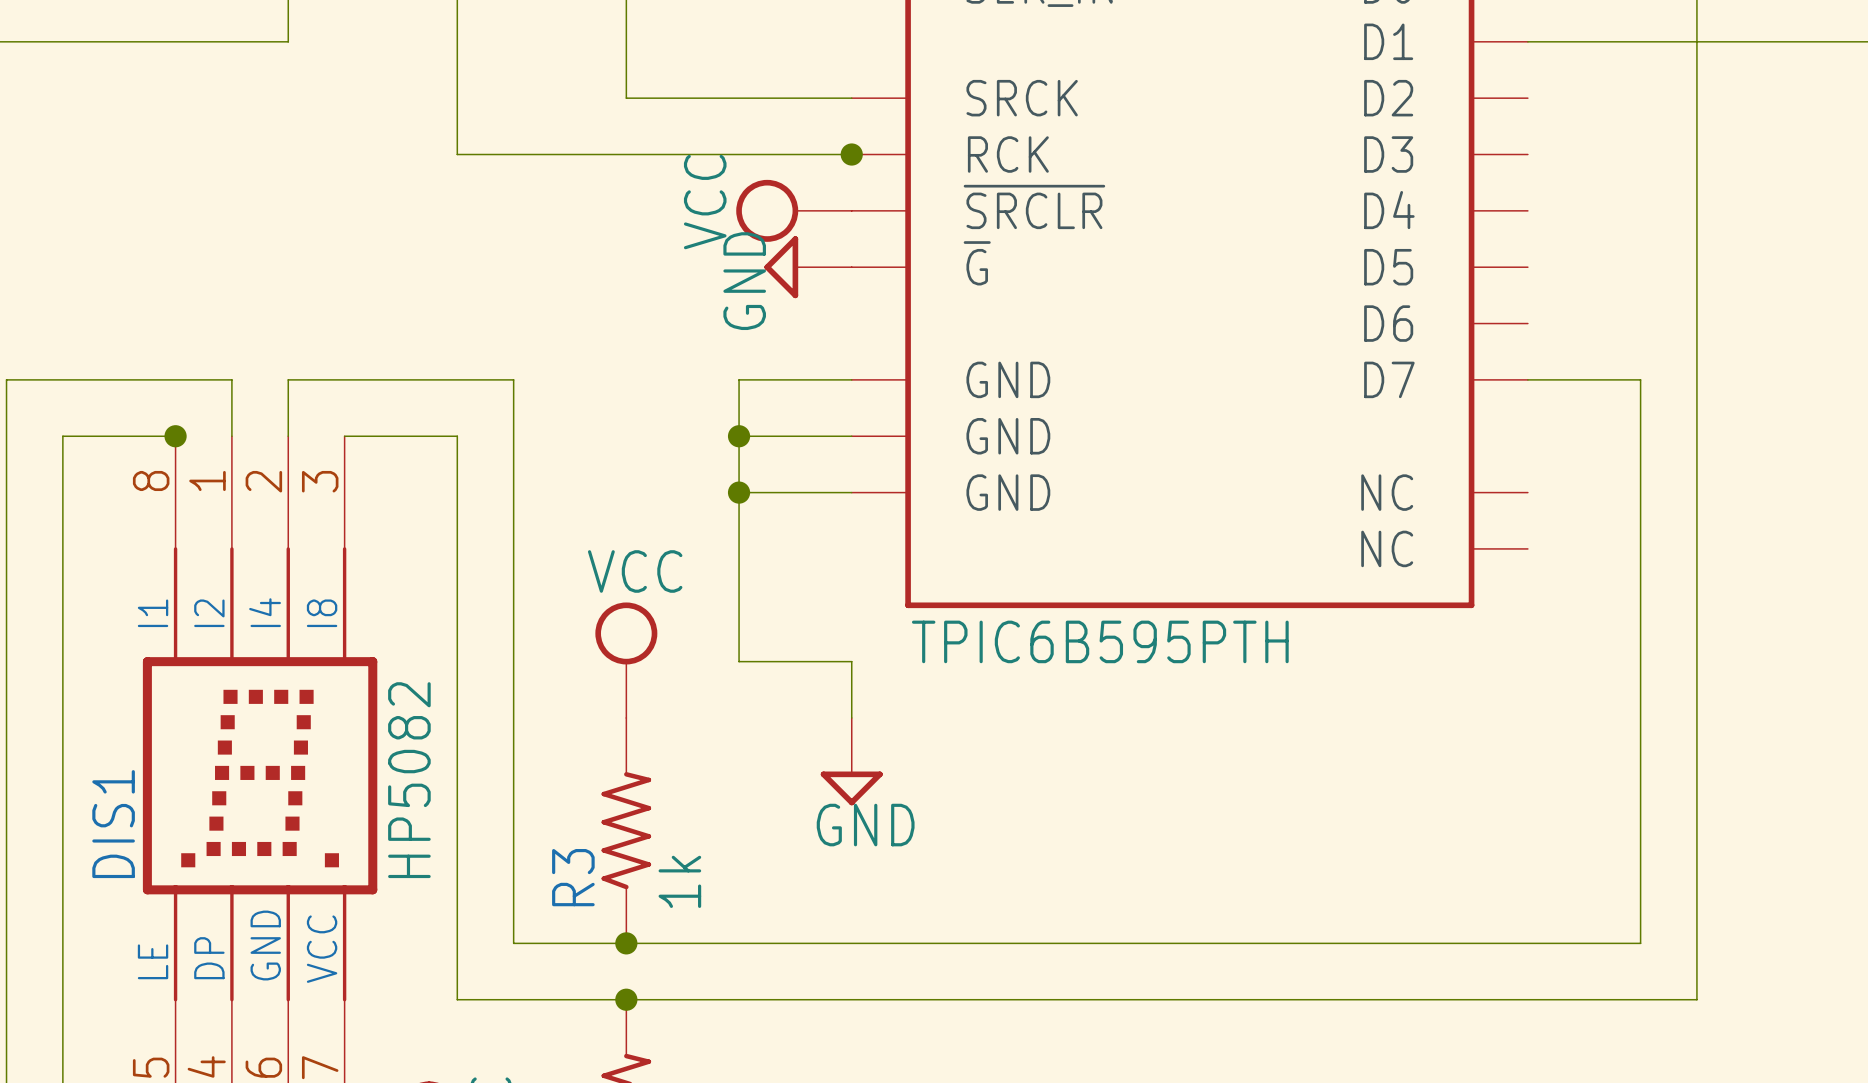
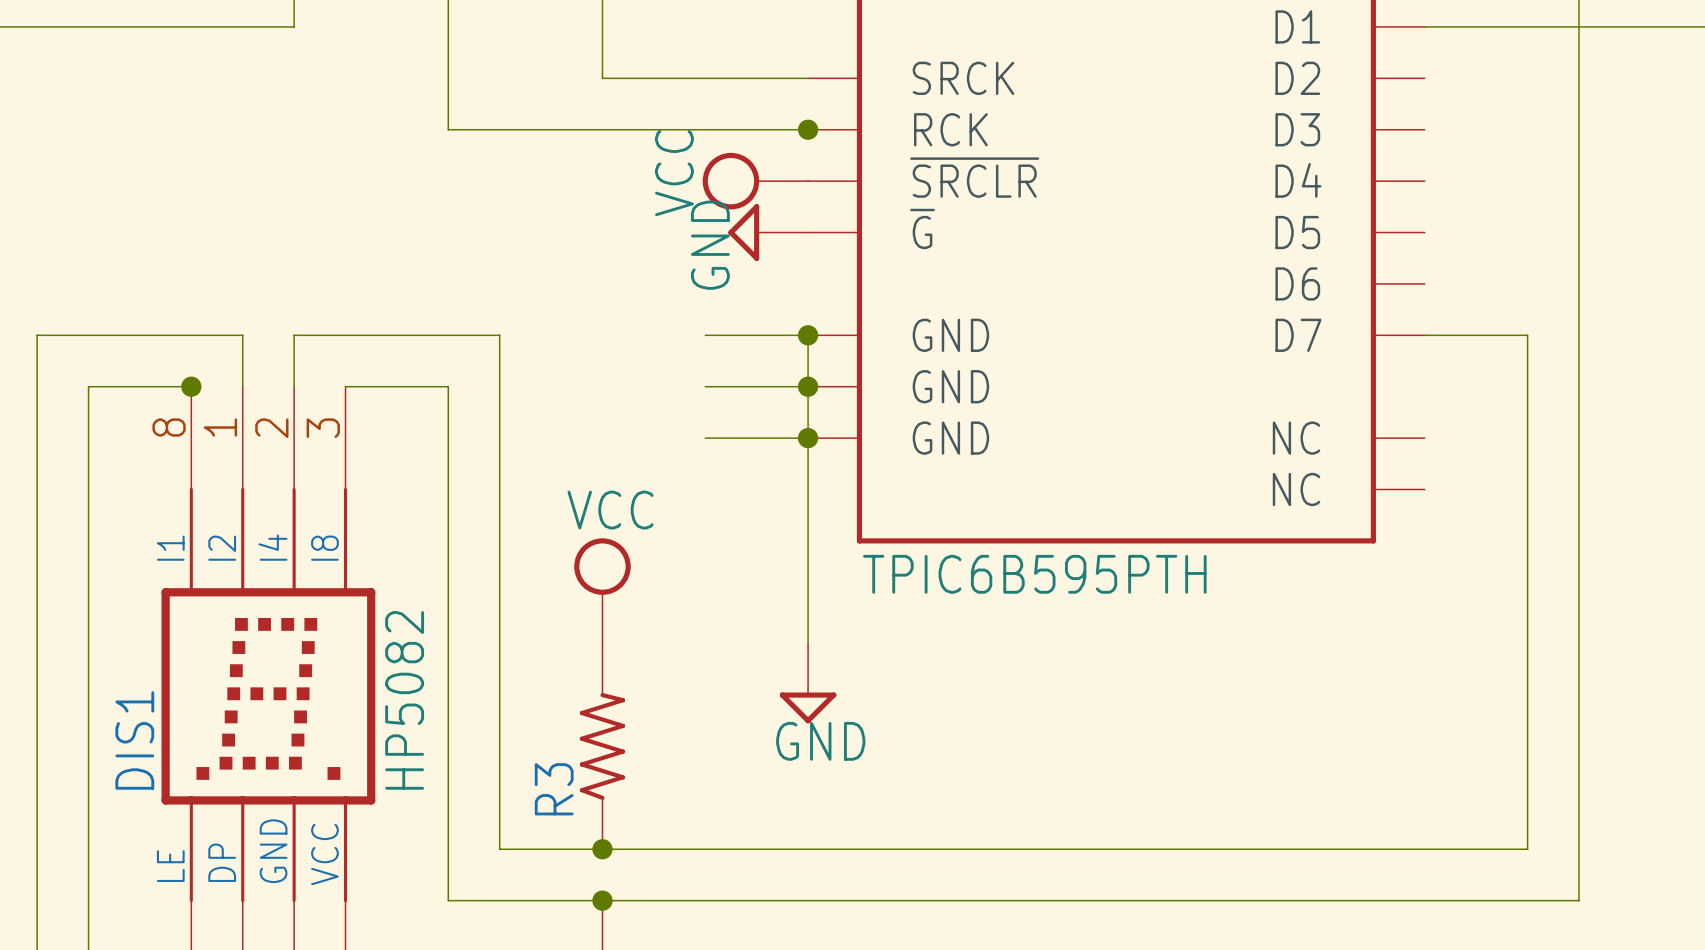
wire: (739, 379) (739, 661) (851, 661) -> (808, 335) (808, 592)
junction: none -> (808, 335)
junction: (739, 436) -> none
junction: none -> (808, 386)
junction: (739, 492) -> none
junction: none -> (808, 438)
R3 value: 1k (679, 881) -> none

